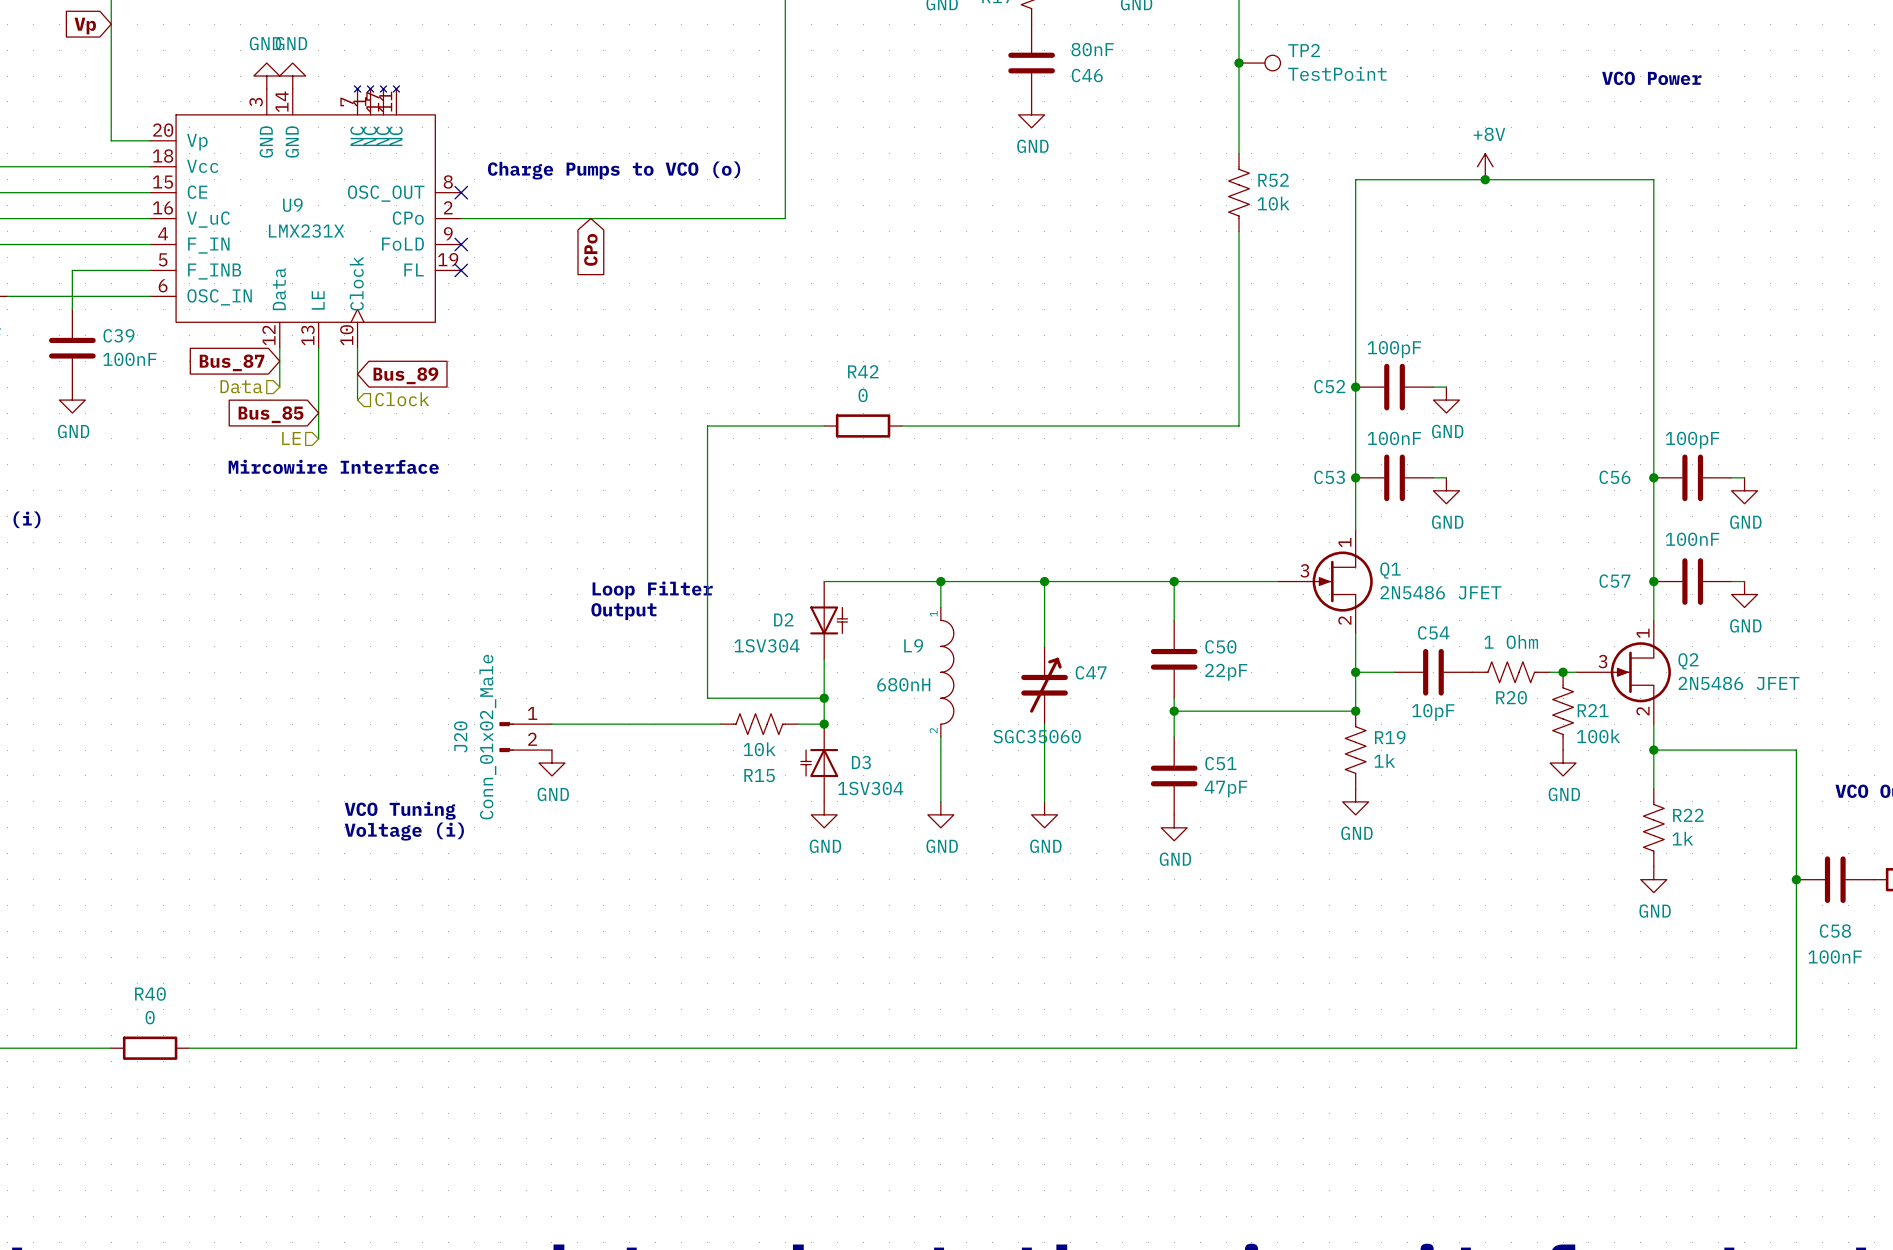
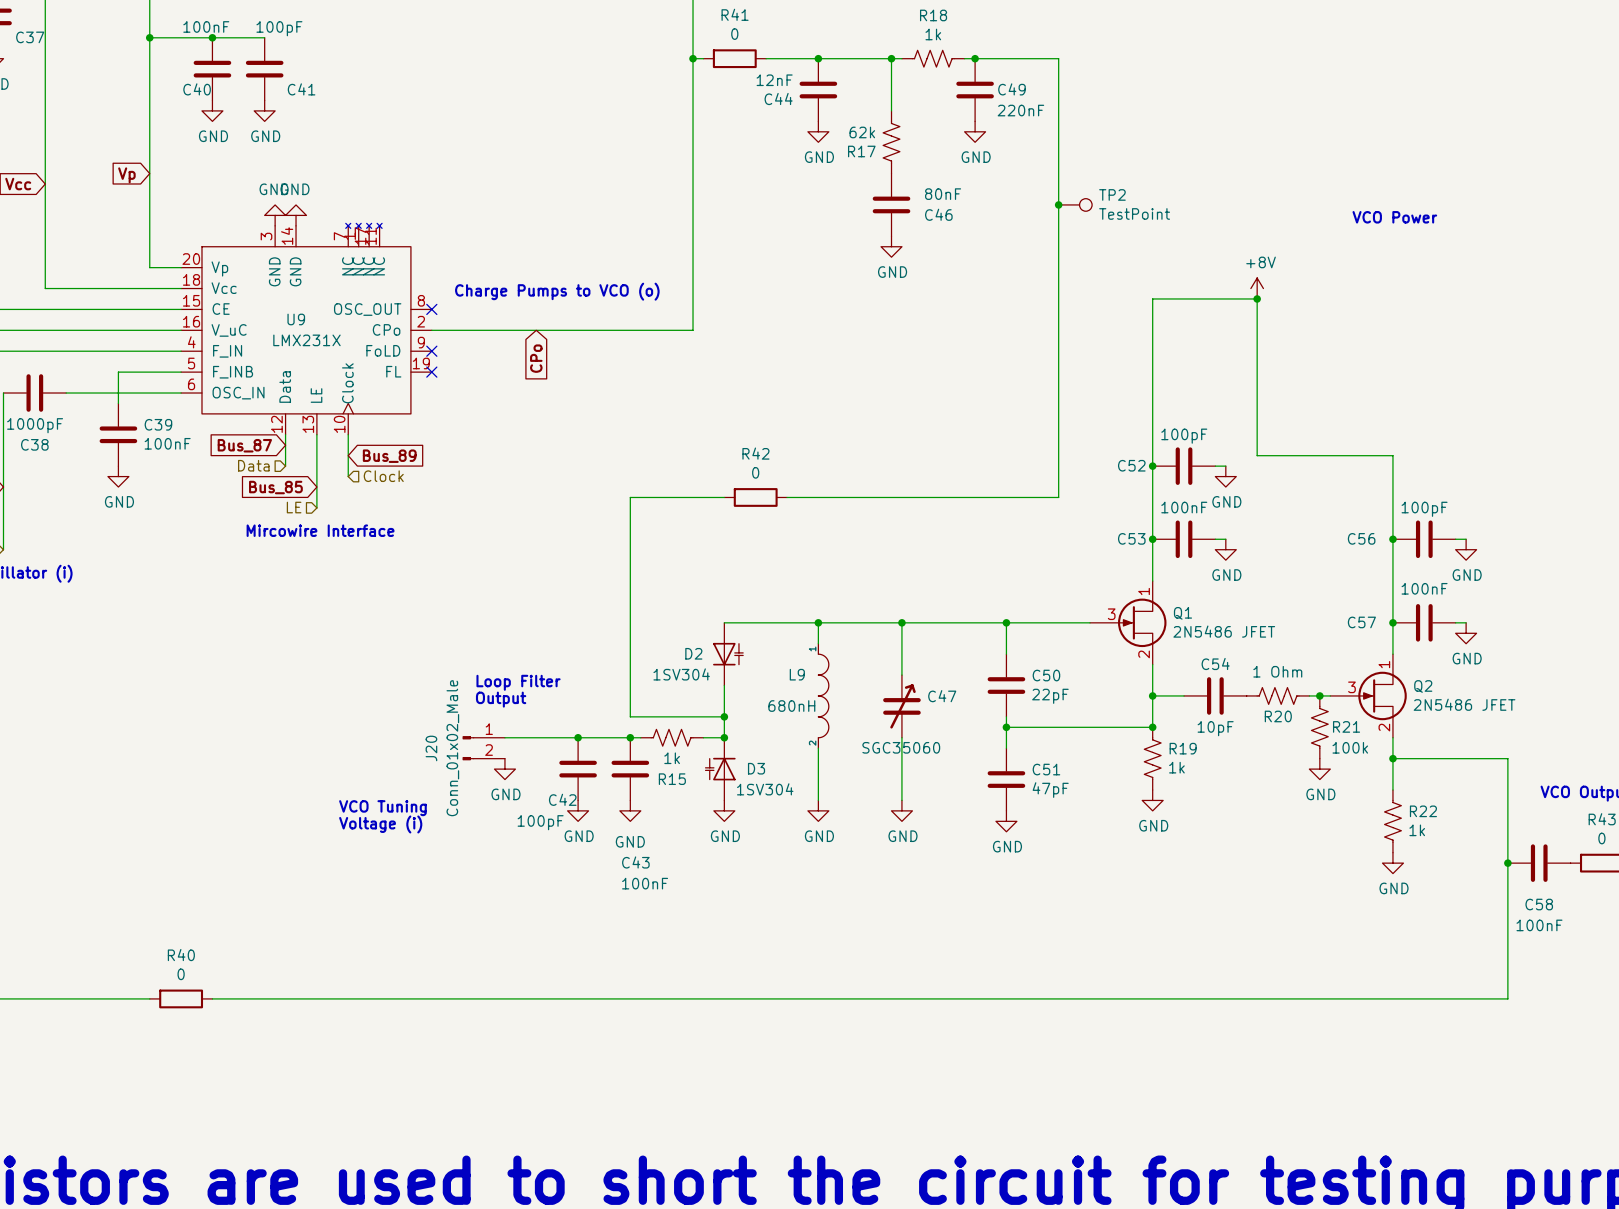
wire: (1485, 179) (1653, 179) (1653, 374) -> (1257, 298) (1257, 455) (1392, 455)
R52: 10k (1239, 192) -> none
text position: Loop Filter (652, 590) -> Loop Filter (518, 682)
text position: Output (623, 611) -> Output (501, 699)
junction: none -> (578, 737)
junction: none -> (630, 737)
R15 value: 10k (759, 749) -> 1k (672, 758)
C42: none -> 100pF (578, 769)
C43: none -> 100nF (630, 769)
power symbol: none -> GND (578, 810)
power symbol: none -> GND (630, 810)

